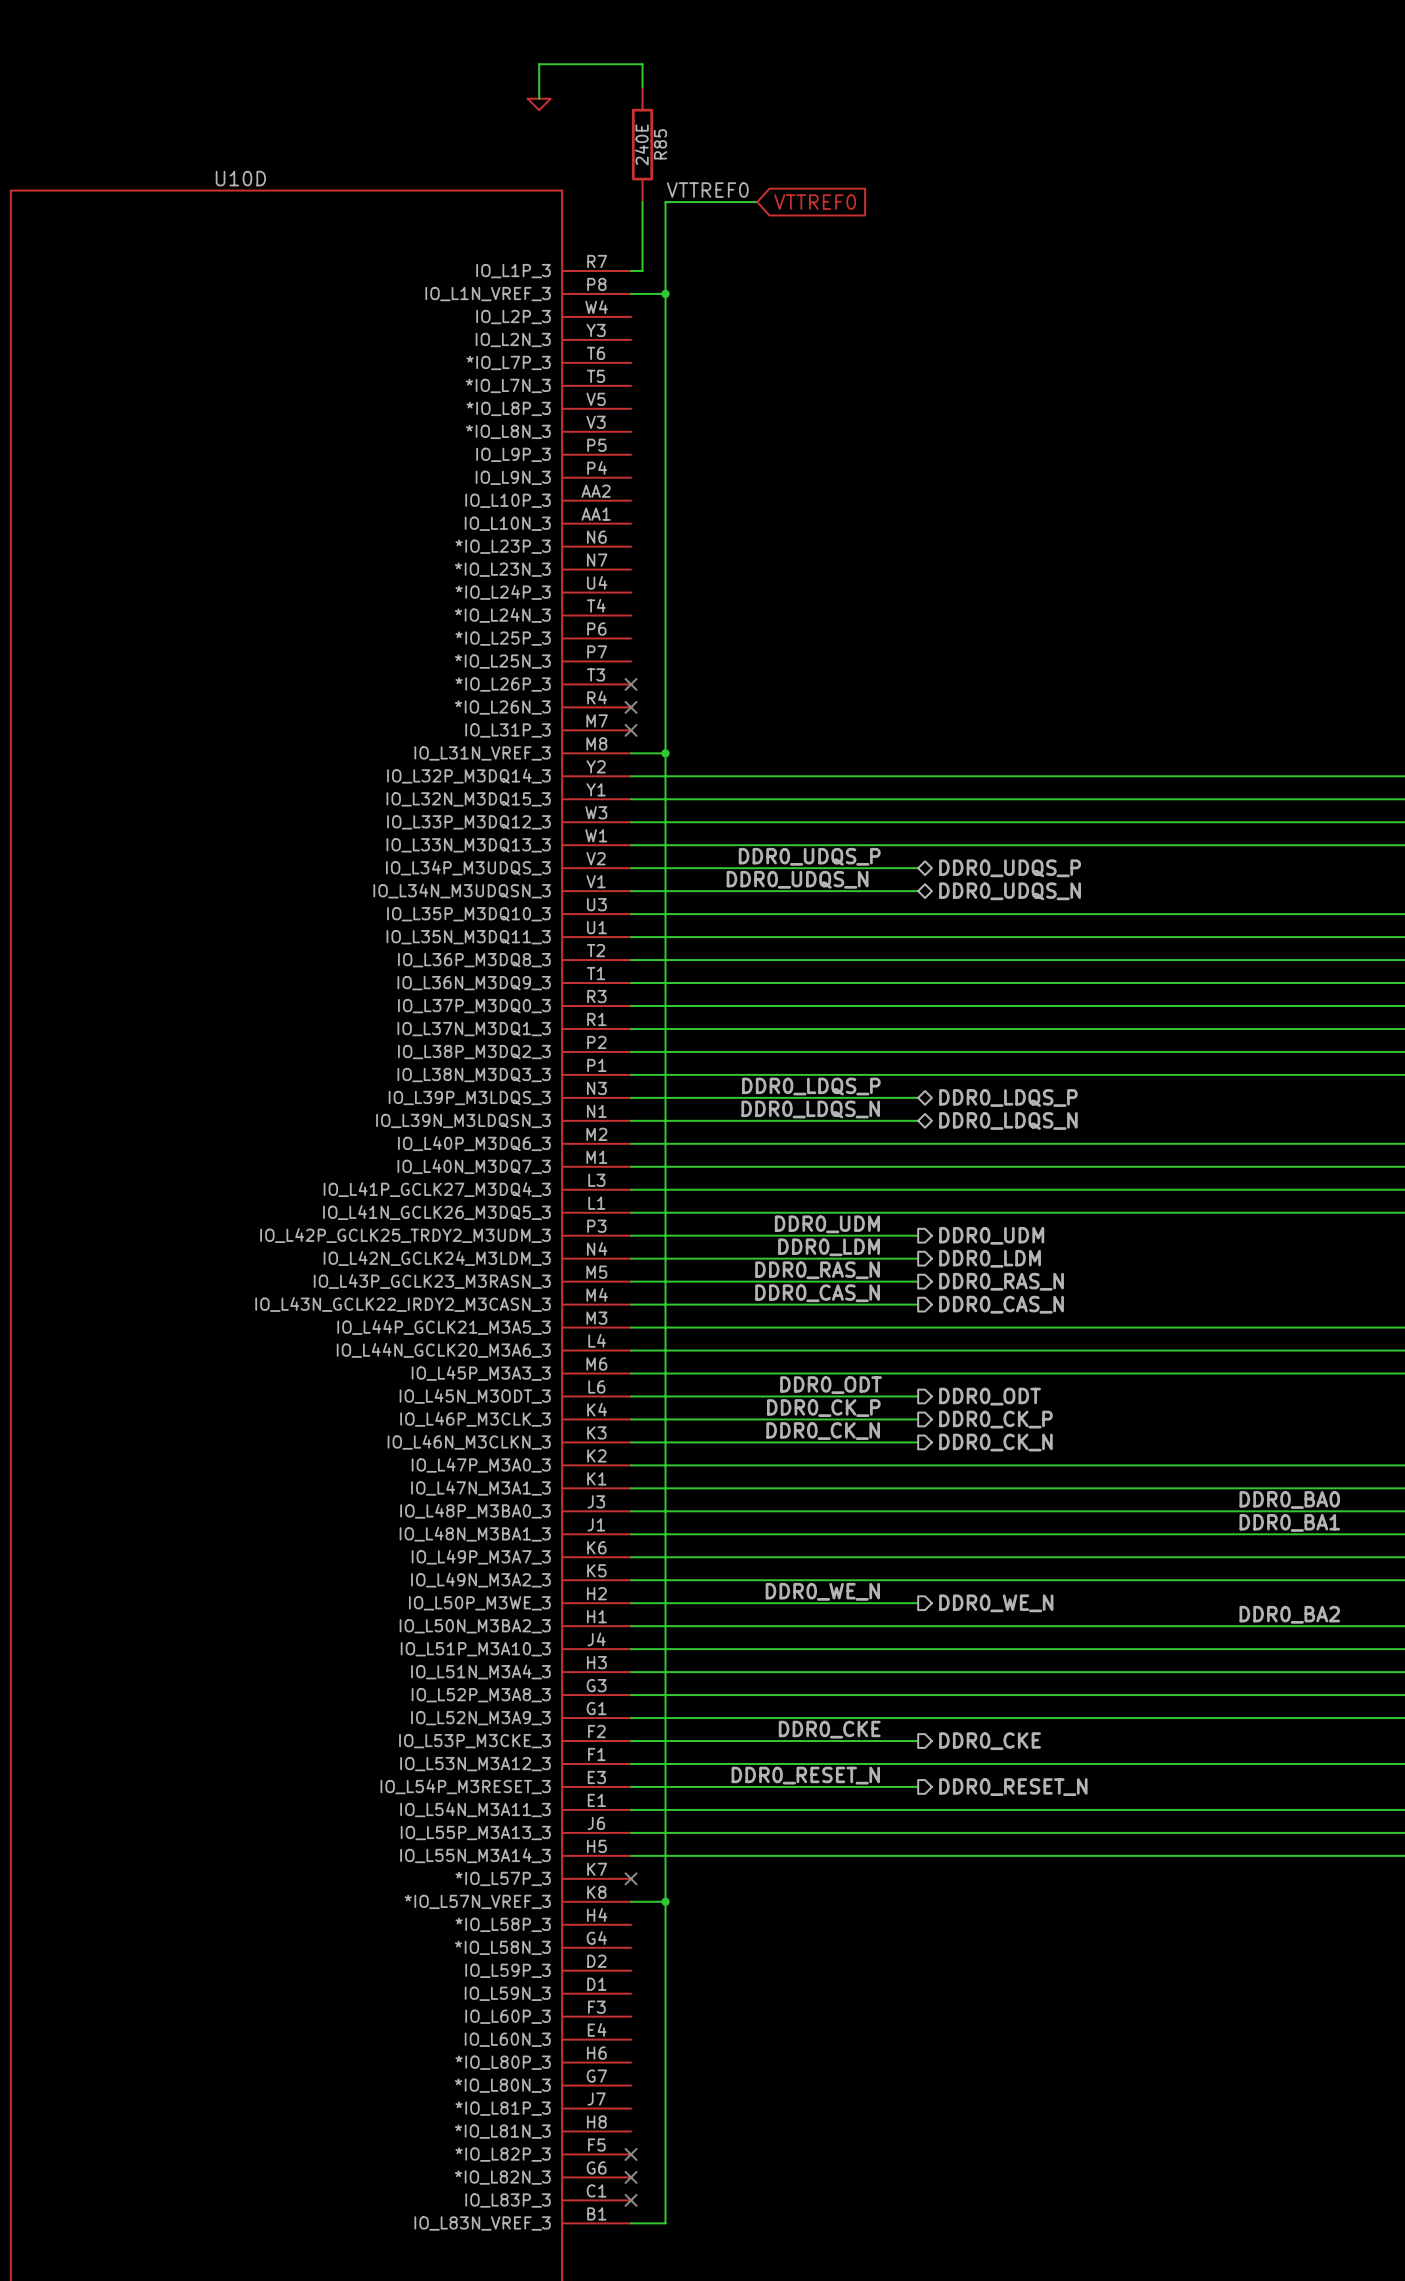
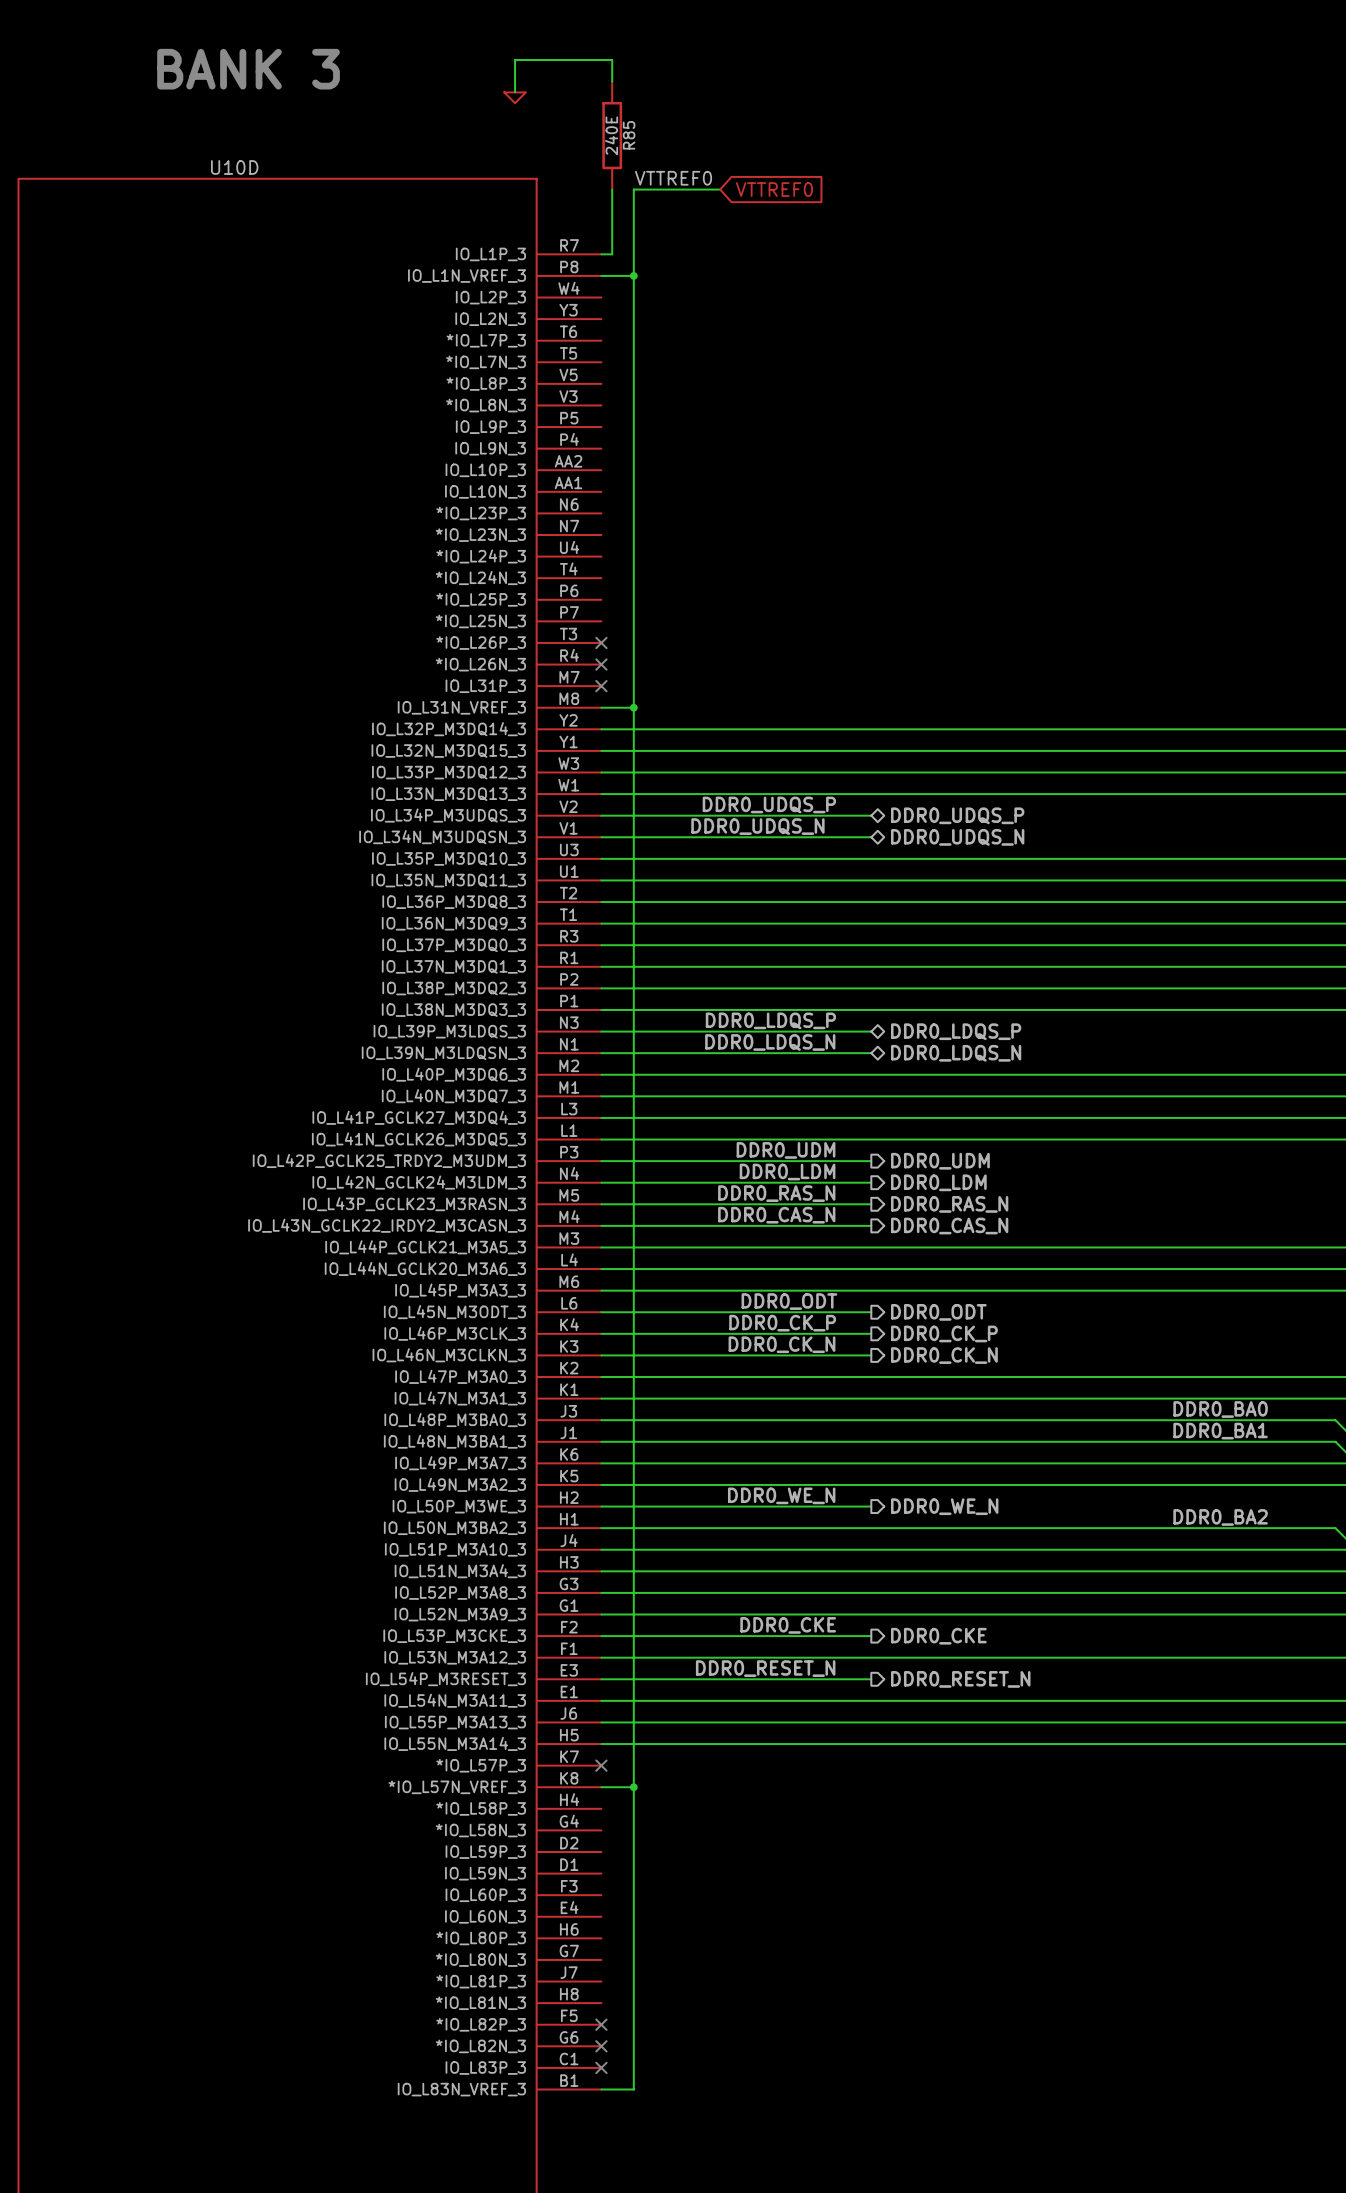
text: none -> BANK 3 (248, 69)

